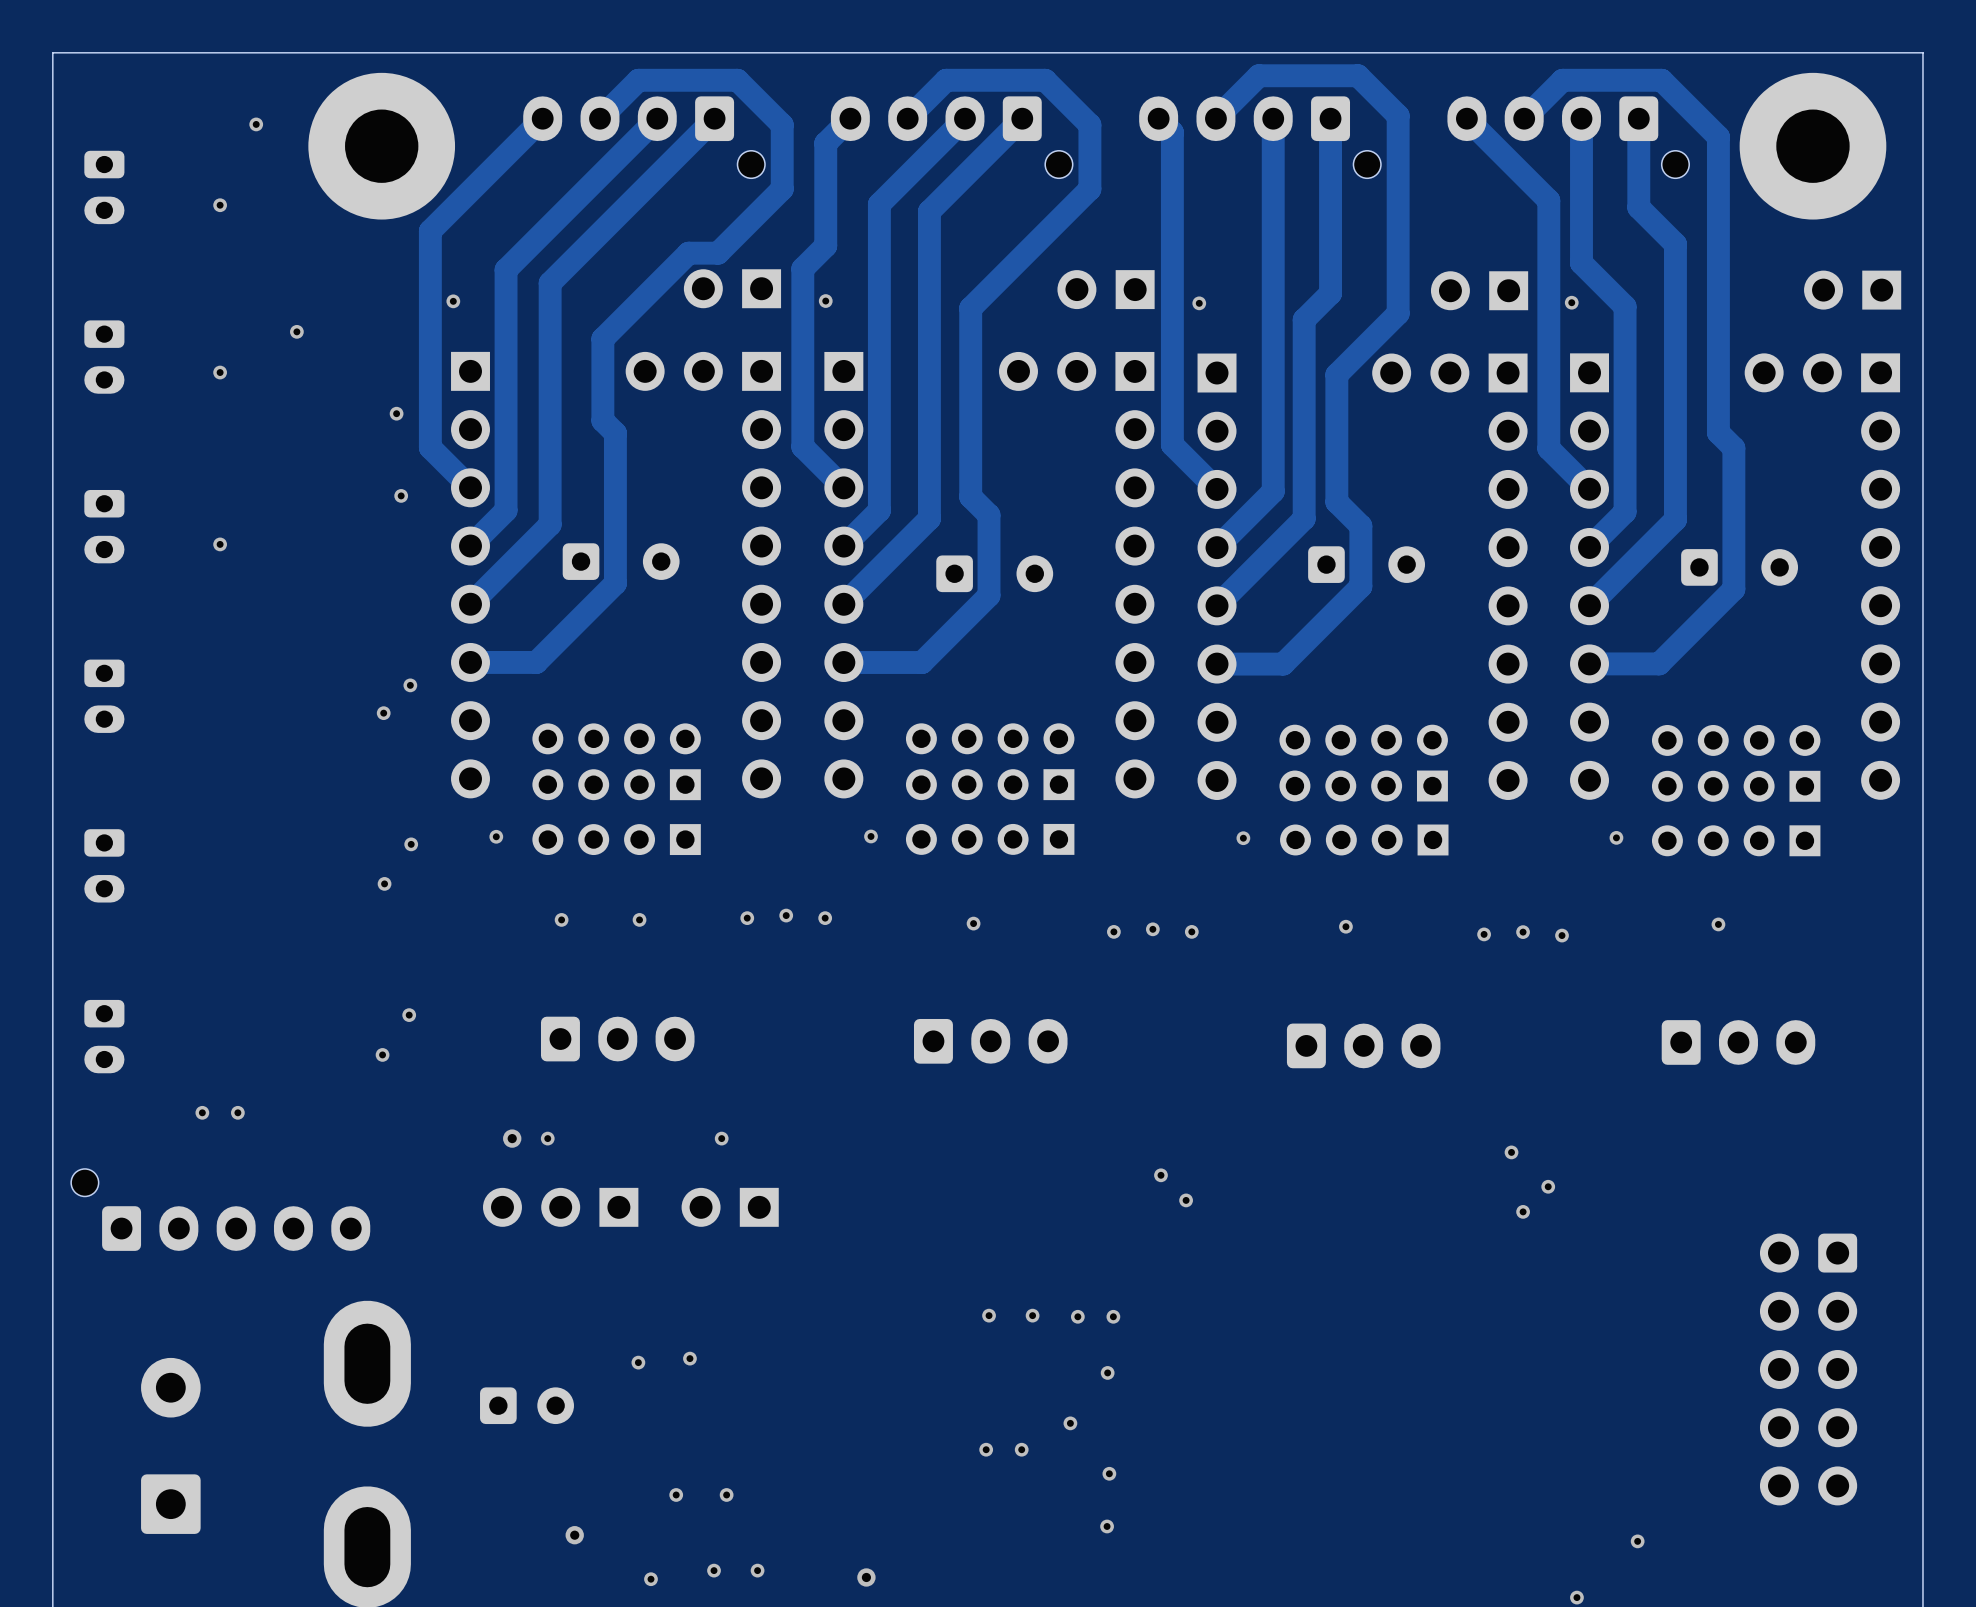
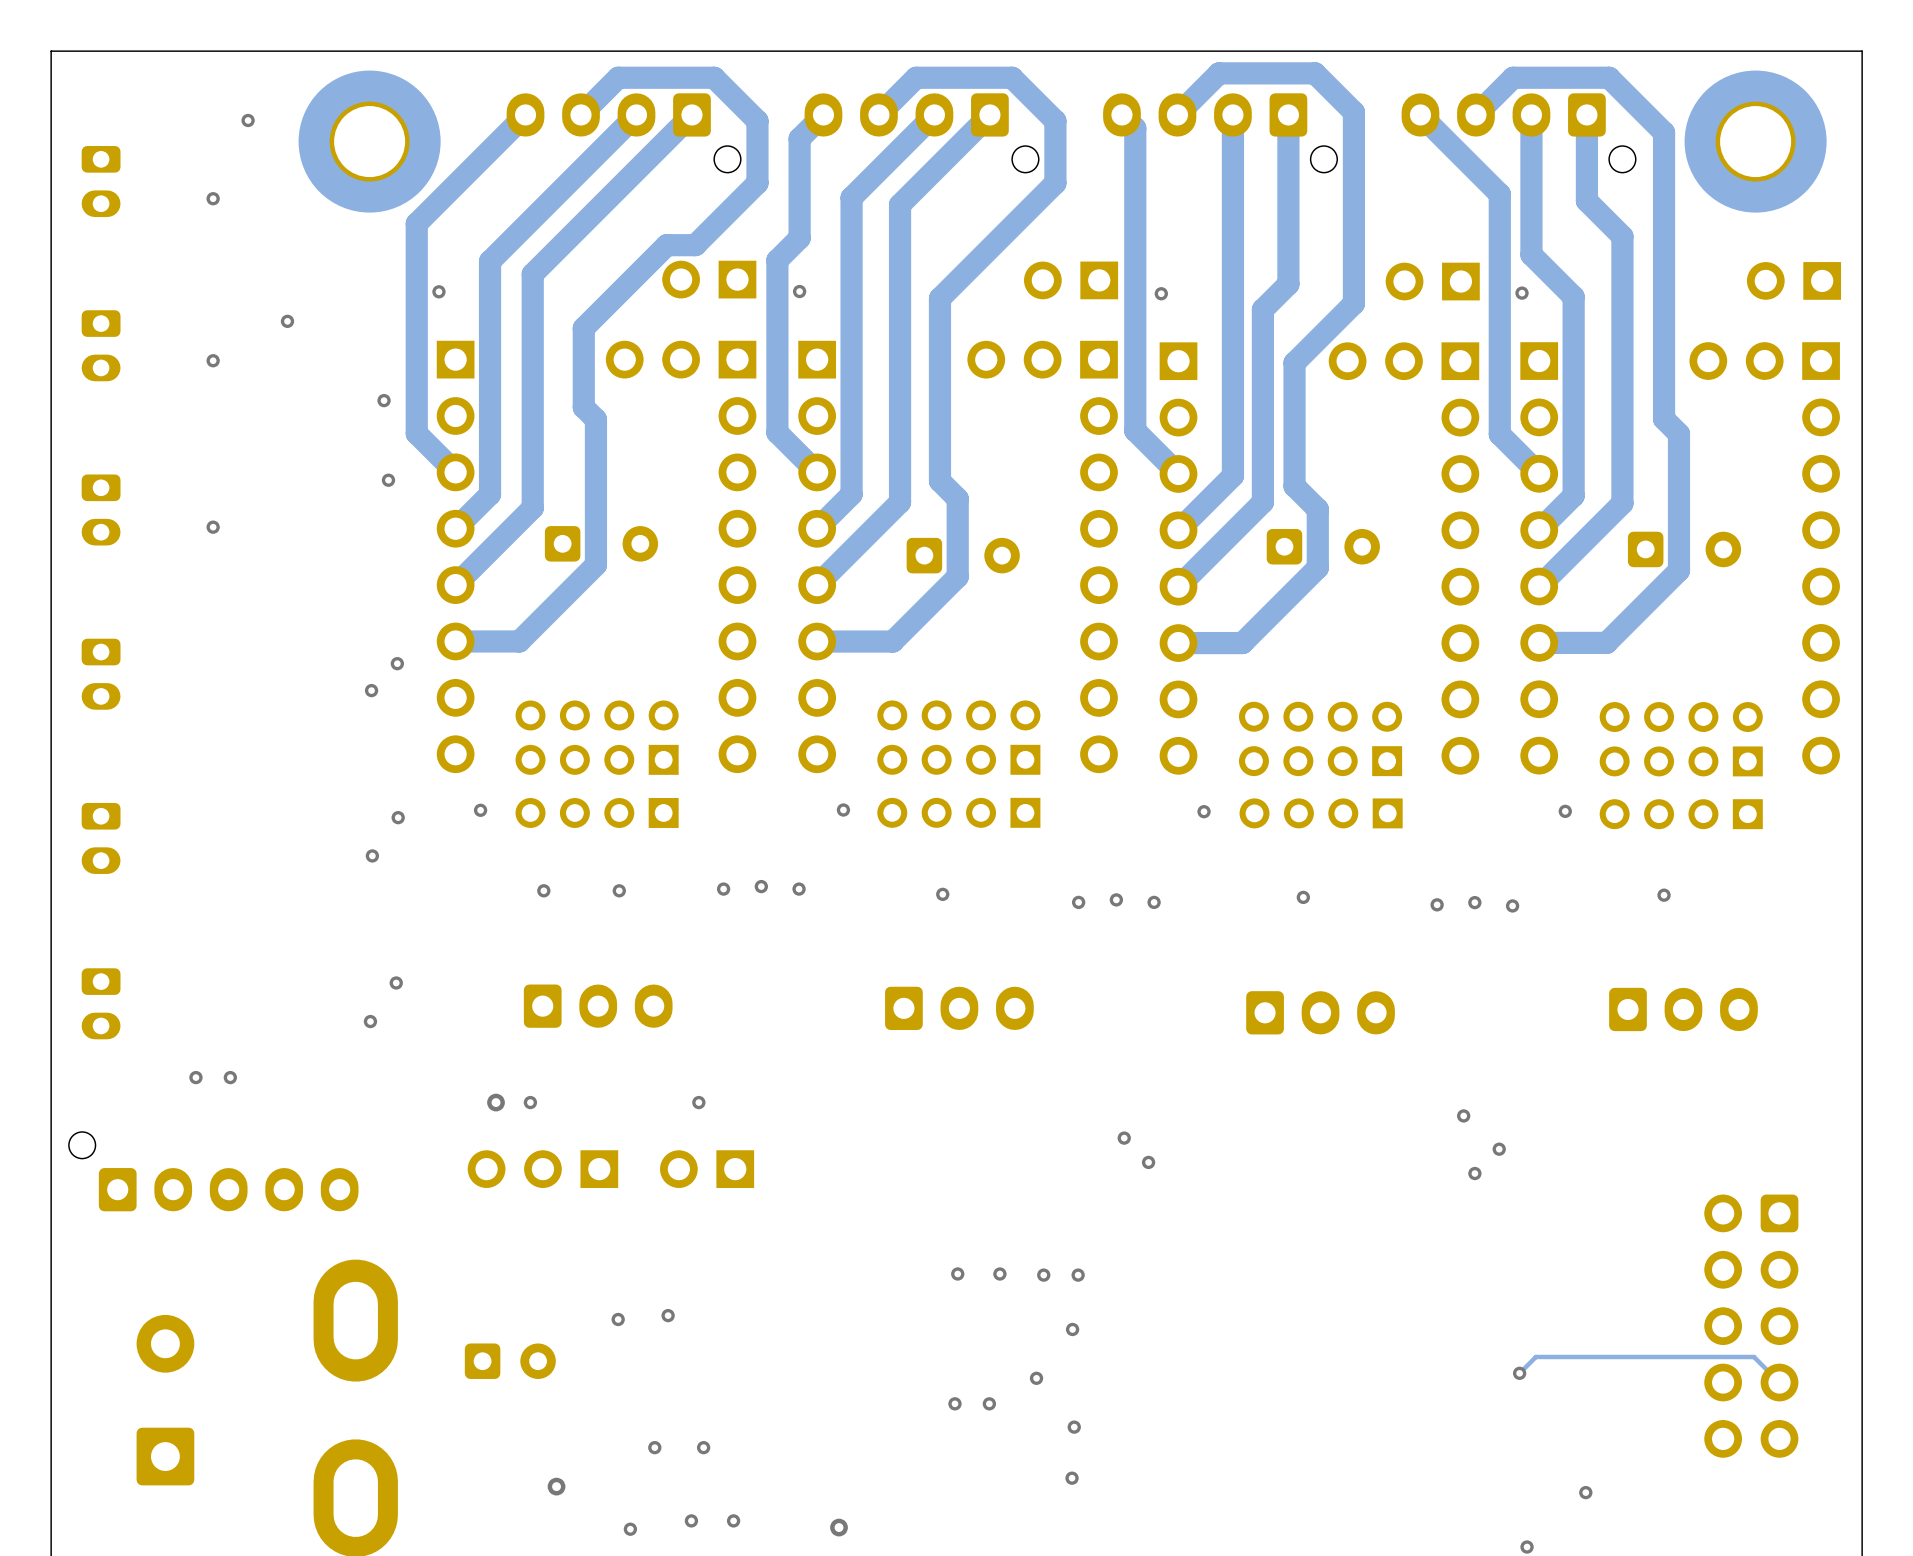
track: none -> (1519, 1373) (1535, 1356) (1753, 1356) (1779, 1382)
via: none -> (1519, 1373)

